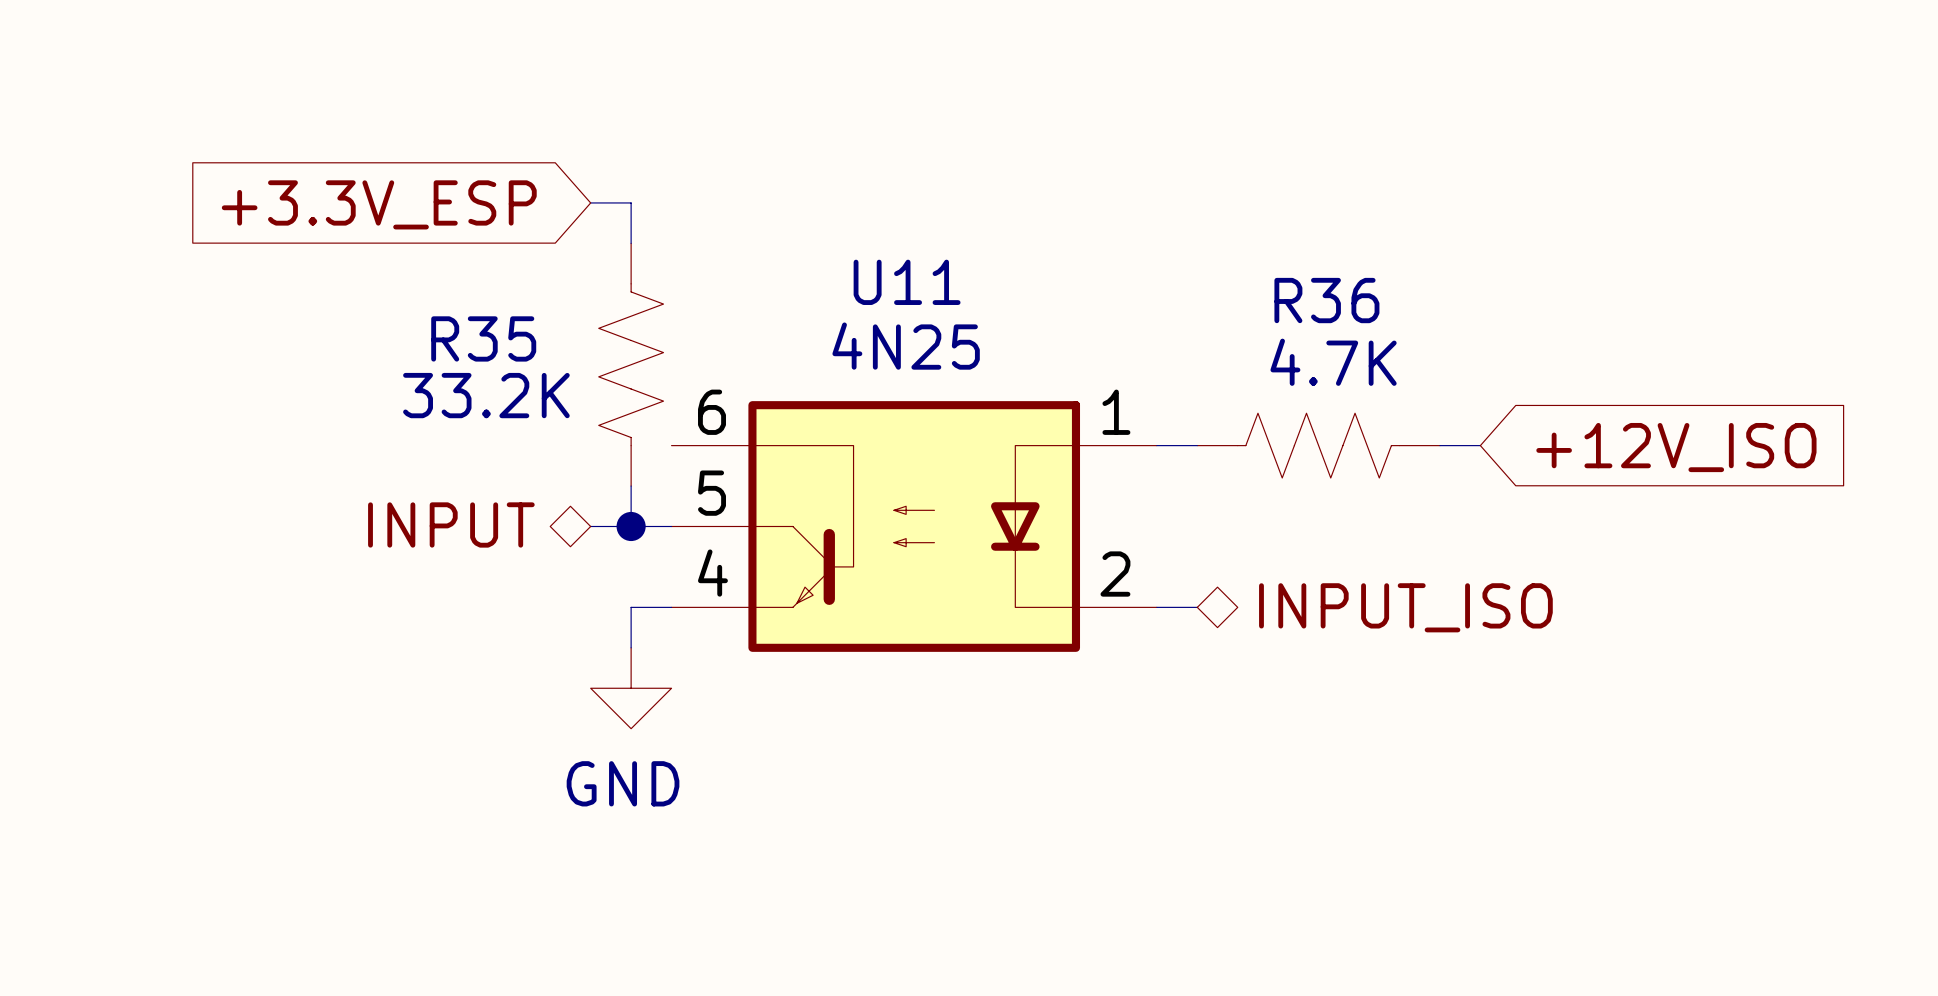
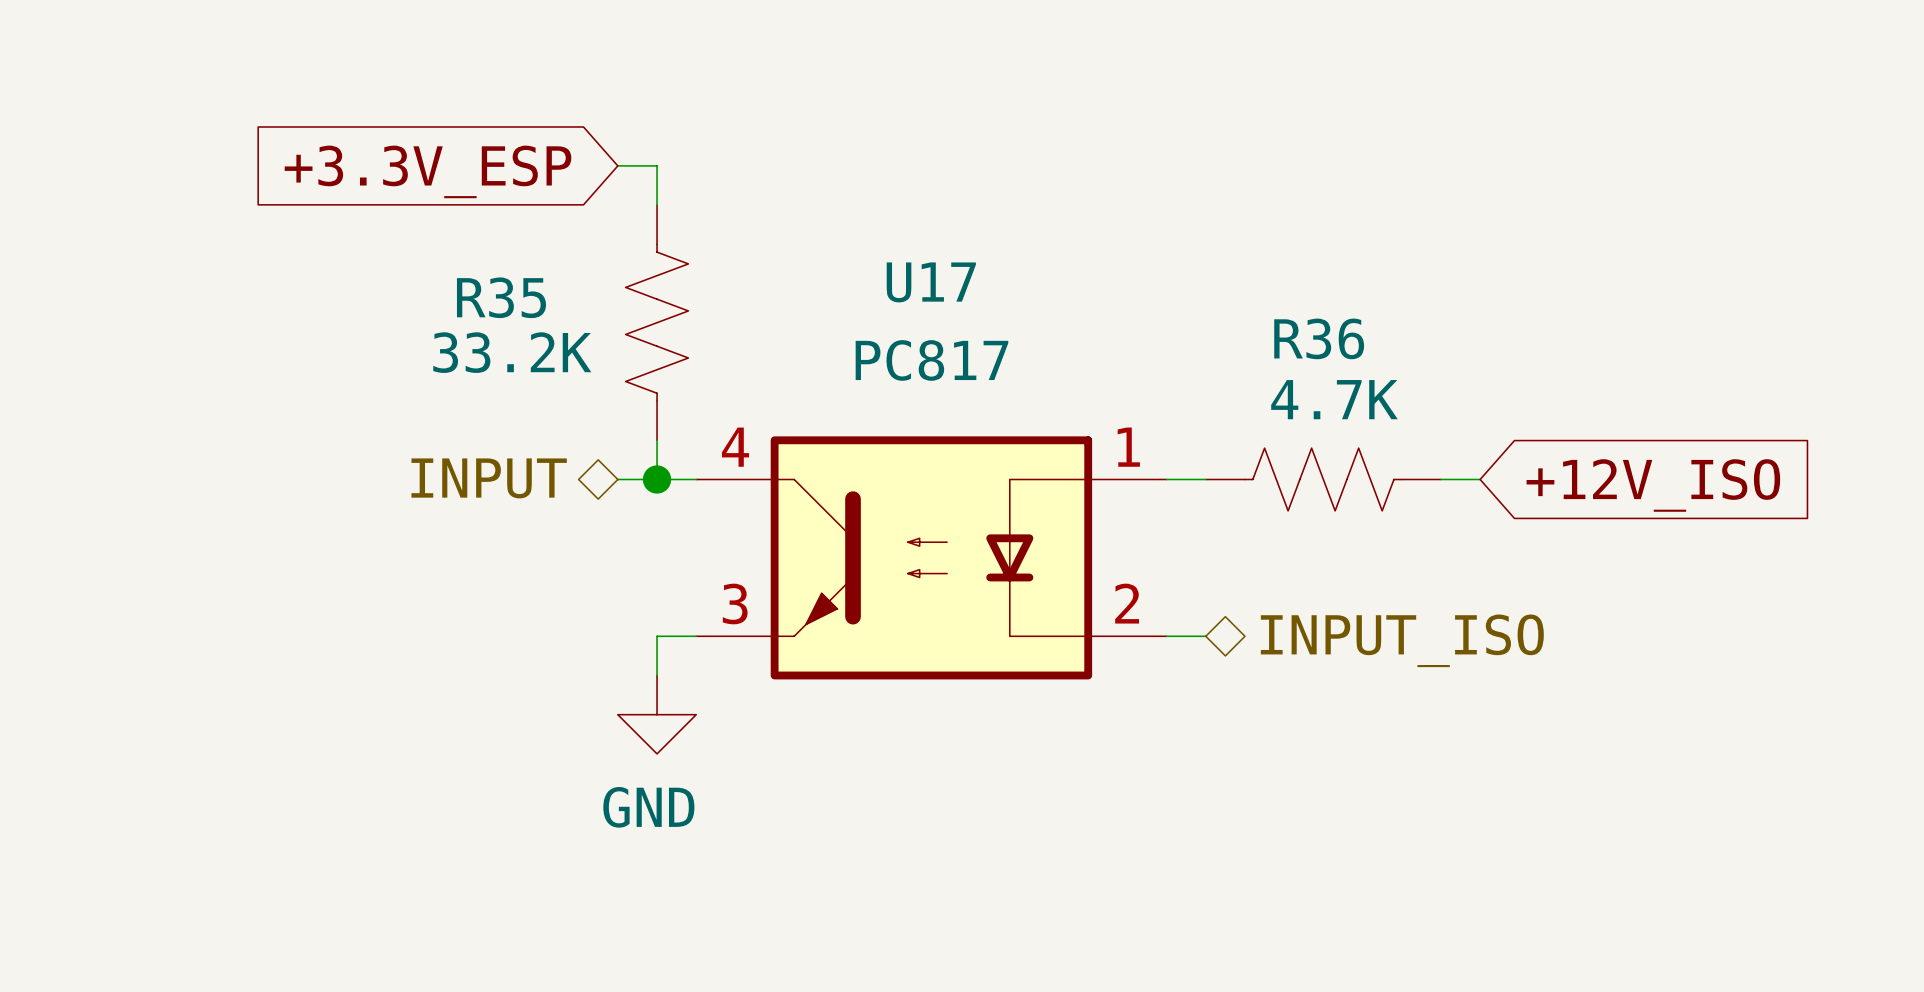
wire: (590, 202) (631, 202) (631, 243) -> (617, 165) (657, 165) (657, 205)
global label position: +3.3V_ESP (379, 204) -> +3.3V_ESP (428, 171)
R35 position: (631, 364) -> (657, 322)
wire: (631, 486) (631, 526) -> (657, 440) (657, 479)
hierarchical label position: INPUT (451, 524) -> INPUT (489, 478)
wire: (590, 526) (671, 526) -> (617, 479) (696, 479)
junction position: (631, 526) -> (657, 479)
U11: 4N25 (914, 526) -> none
U17: none -> PC817 (931, 557)

